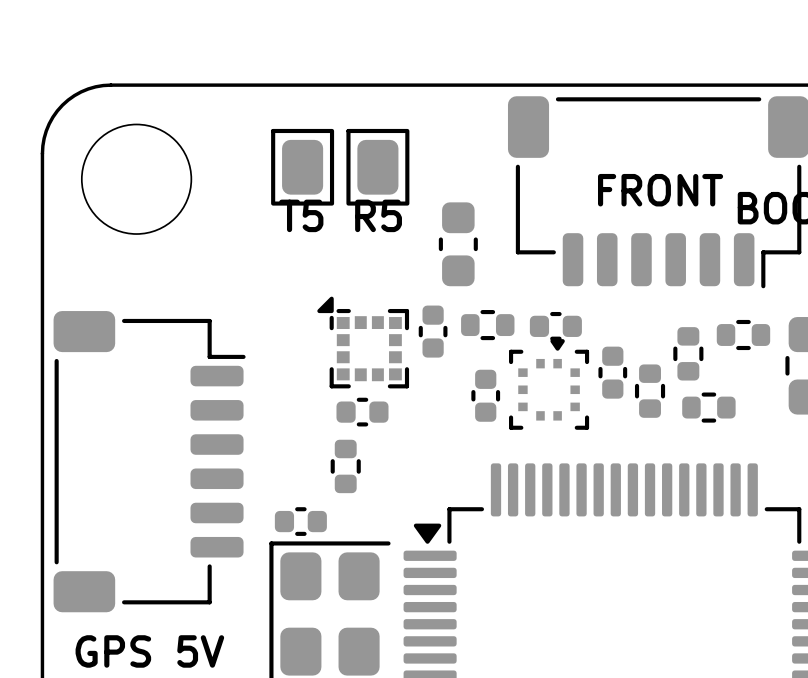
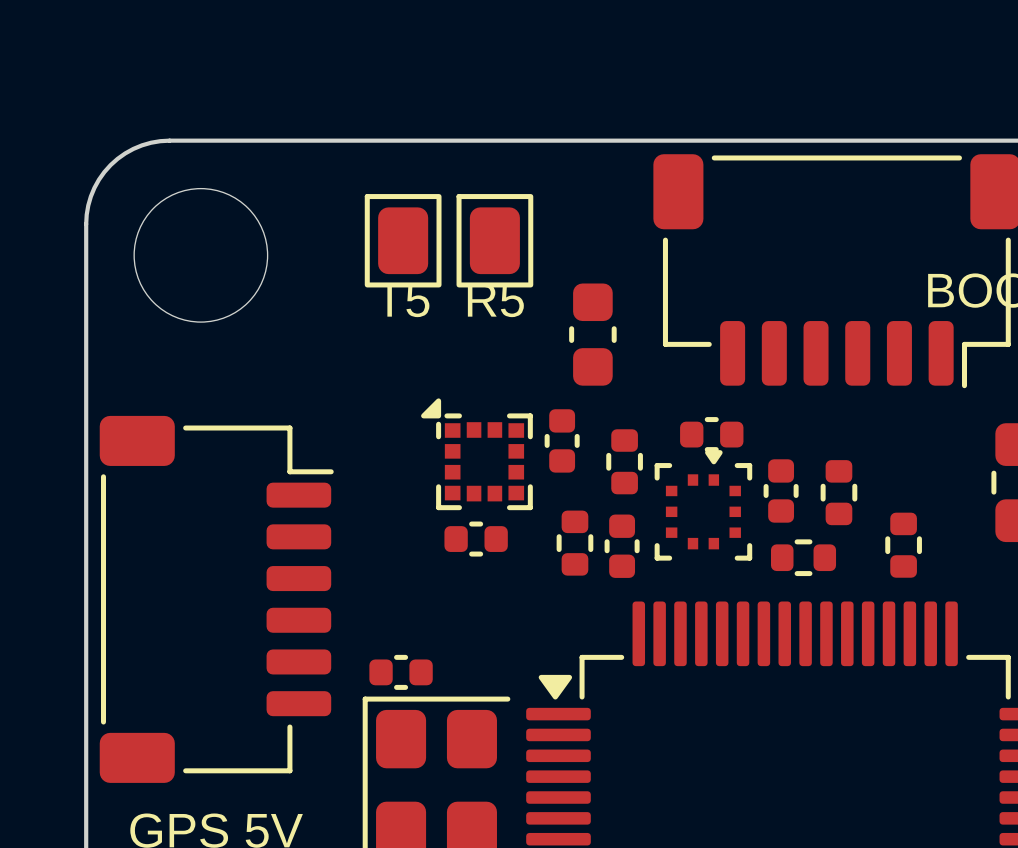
text: FRONT (660, 190) -> none
part rotation: 0° (487, 325) -> 90° clockwise (624, 461)
part: (743, 334) -> none
part: (688, 353) -> none
part: none -> (838, 492)
part: (650, 391) -> none
part position: (485, 395) -> (622, 546)
part rotation: 0° (708, 407) -> 90° clockwise (903, 545)
part: none -> (574, 543)
part: none -> (803, 557)
part: (345, 466) -> none

